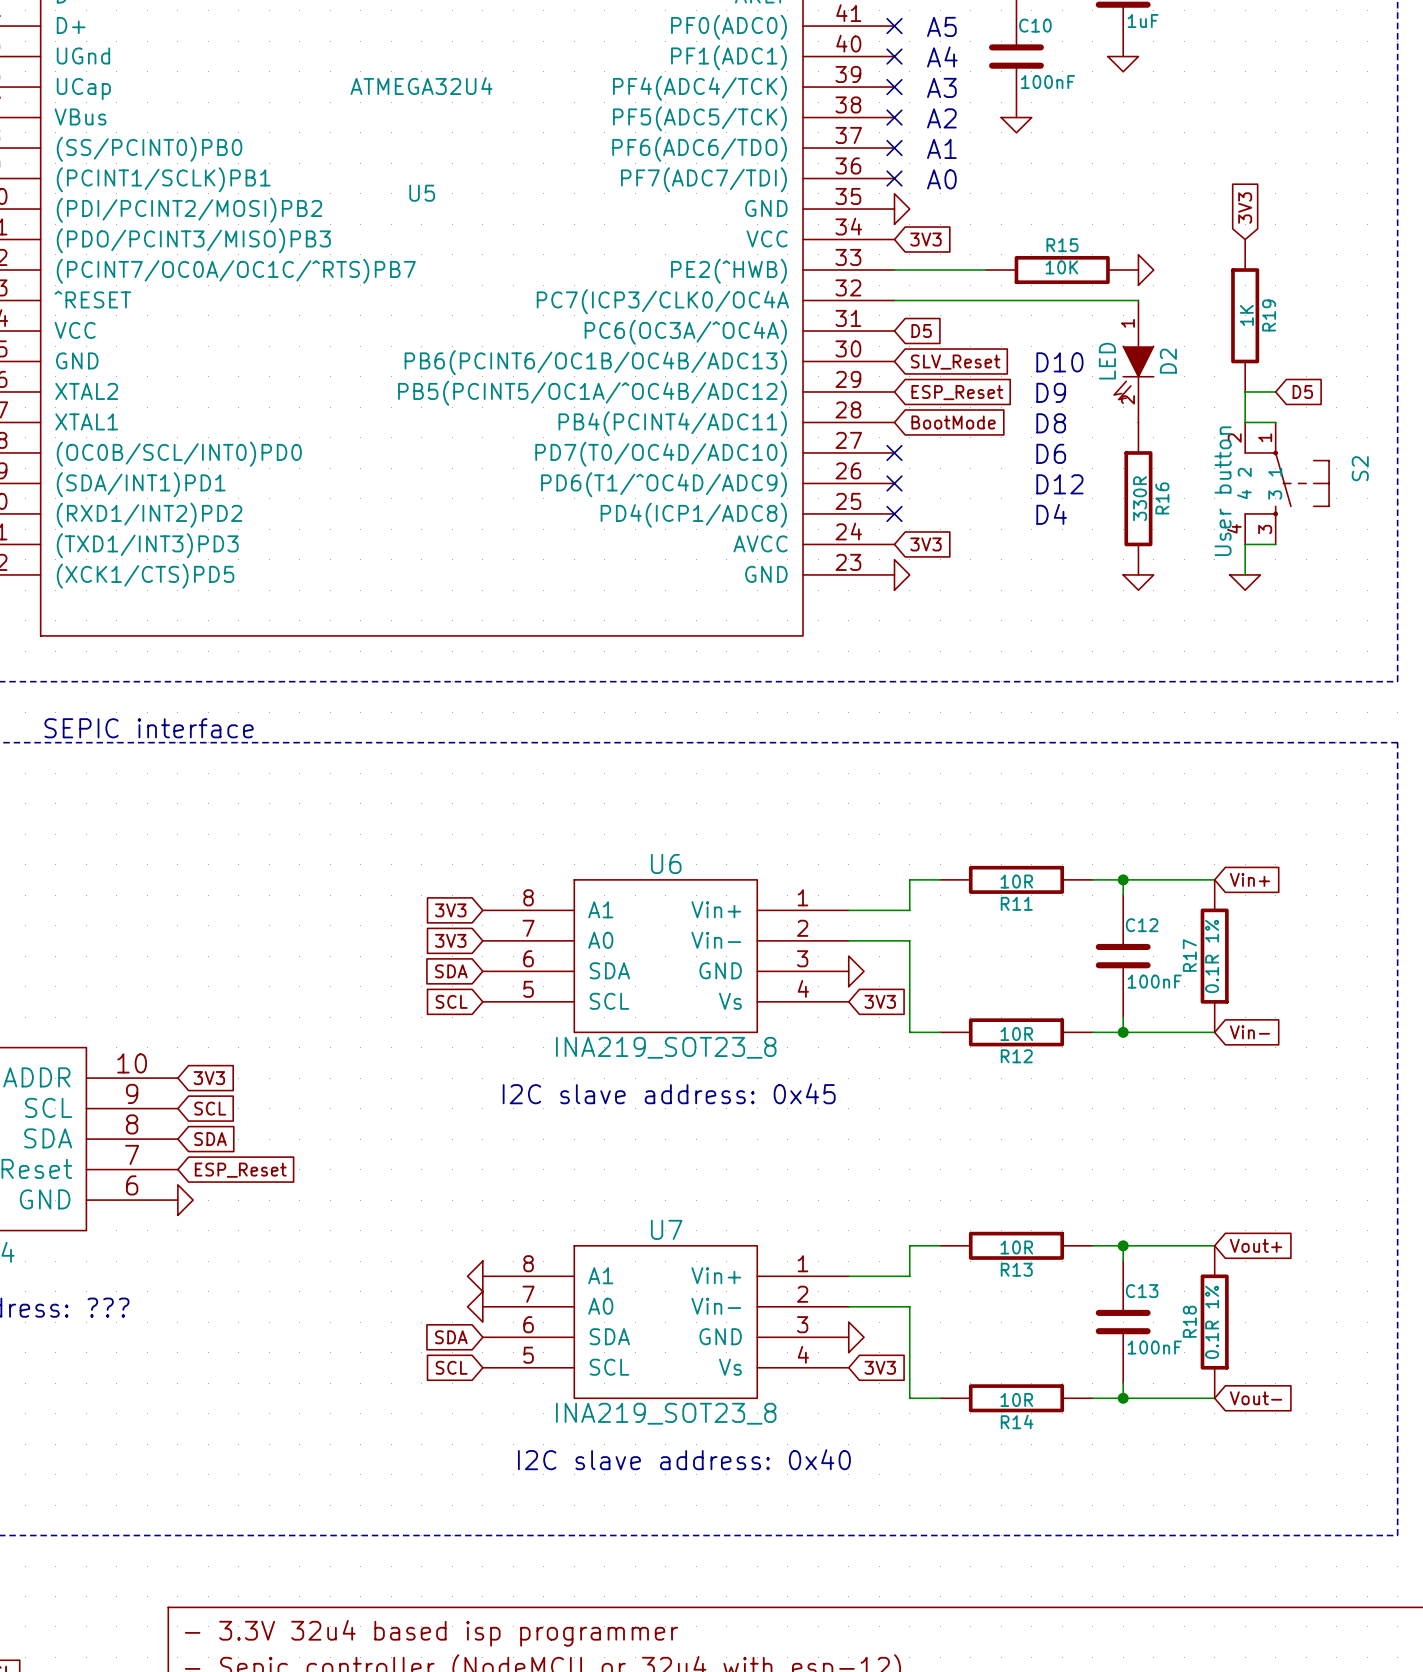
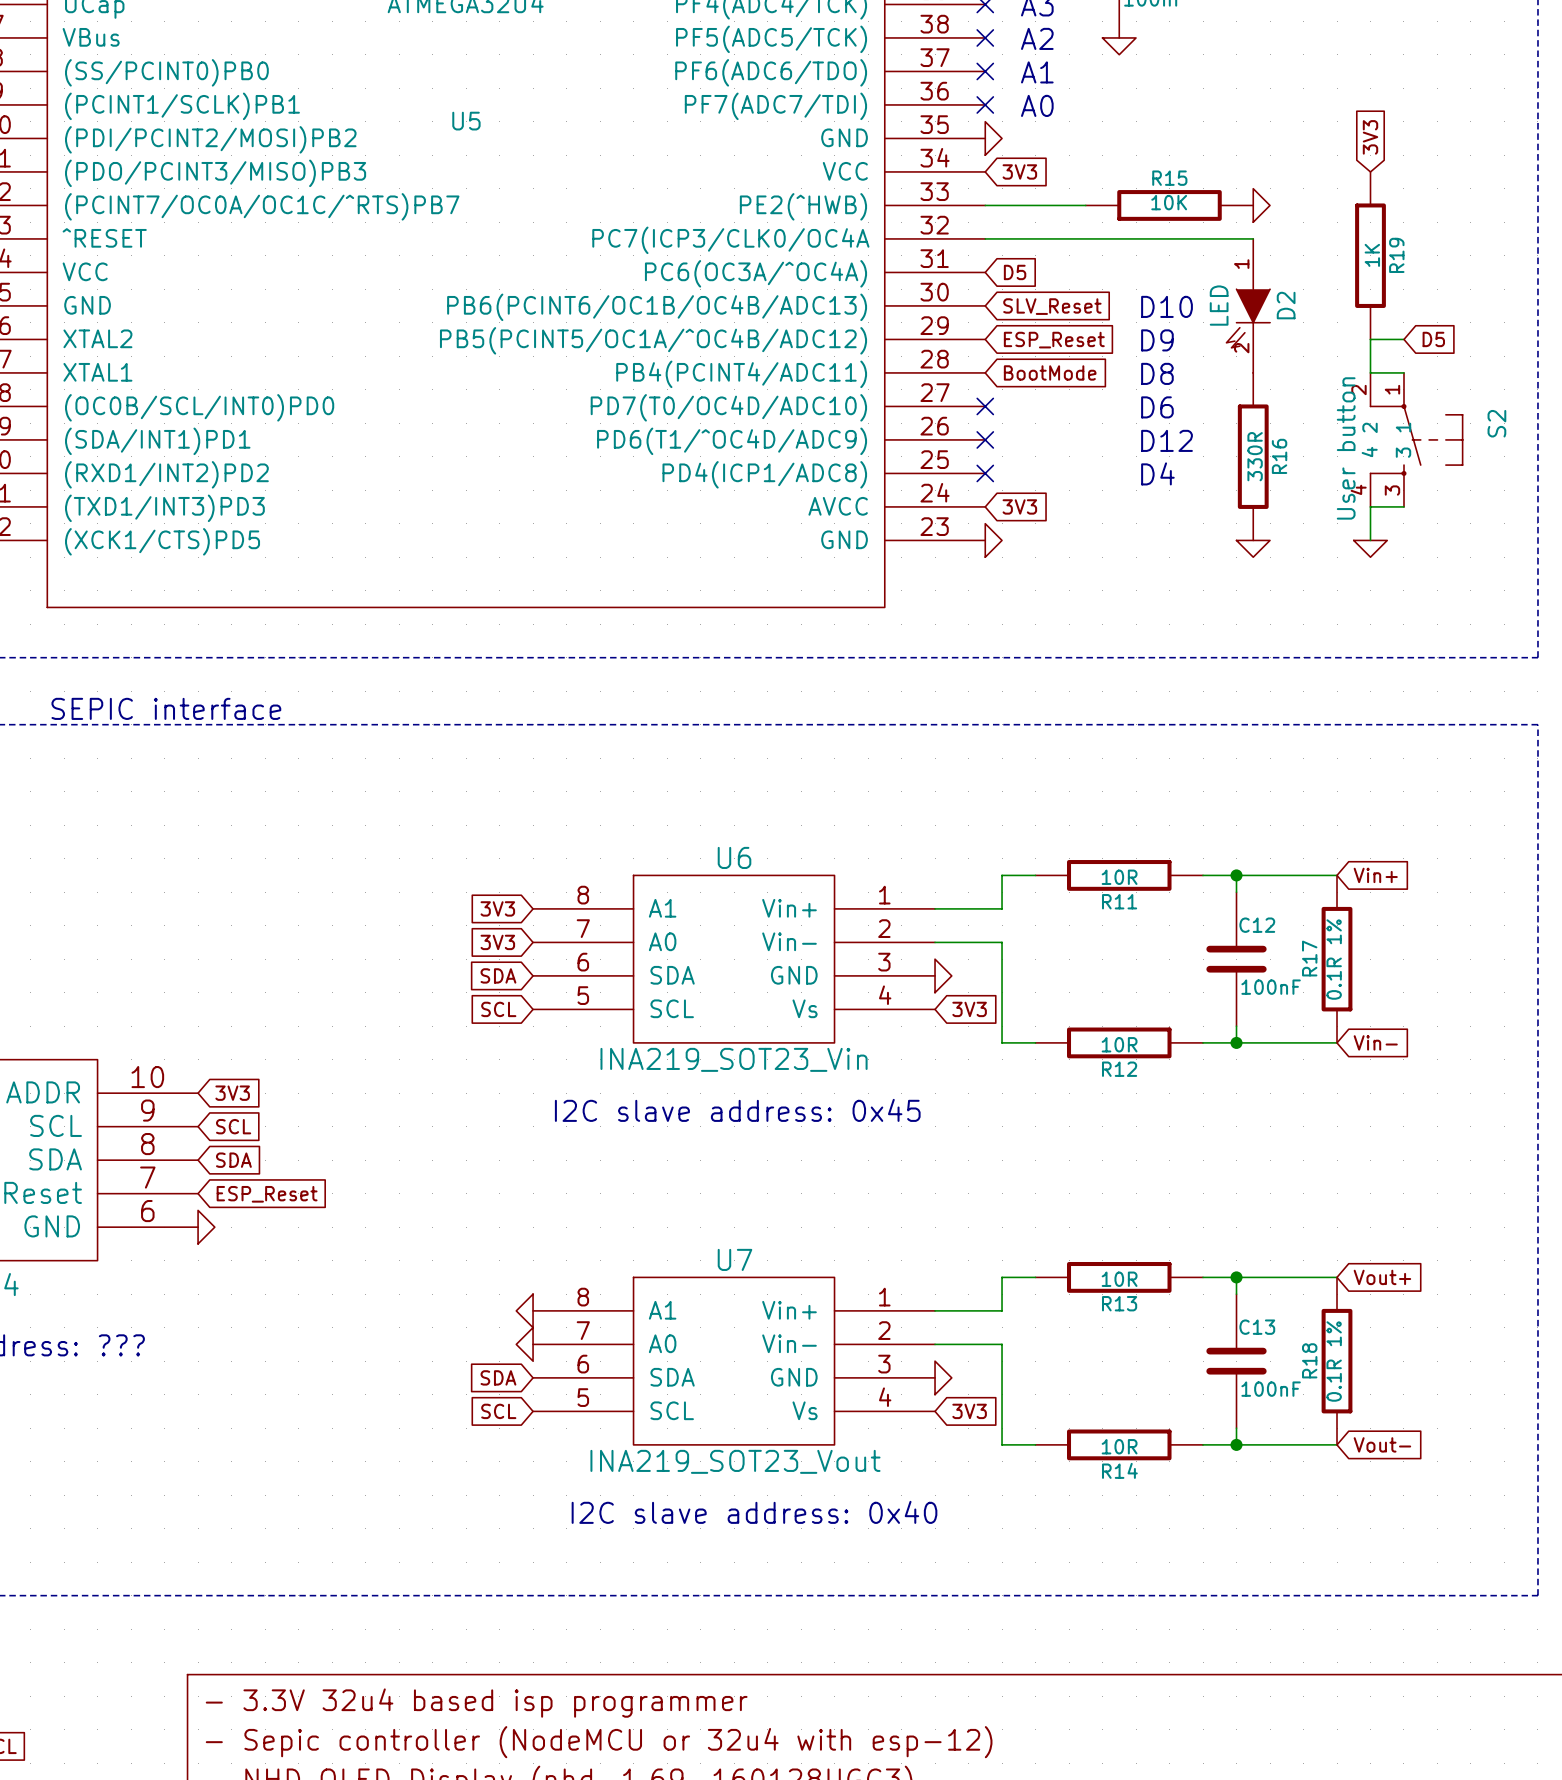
U6 value: INA219_SOT23_8 (666, 1047) -> INA219_SOT23_Vin (734, 1059)
U7 value: INA219_SOT23_8 (666, 1413) -> INA219_SOT23_Vout (735, 1461)

